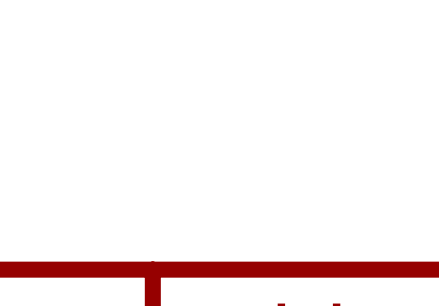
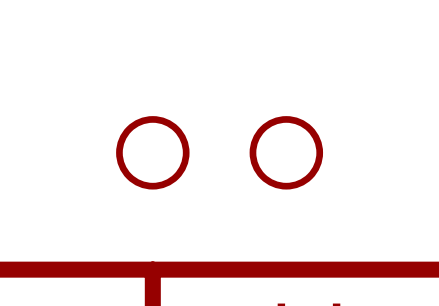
part: none -> (152, 152)
part: none -> (286, 152)

